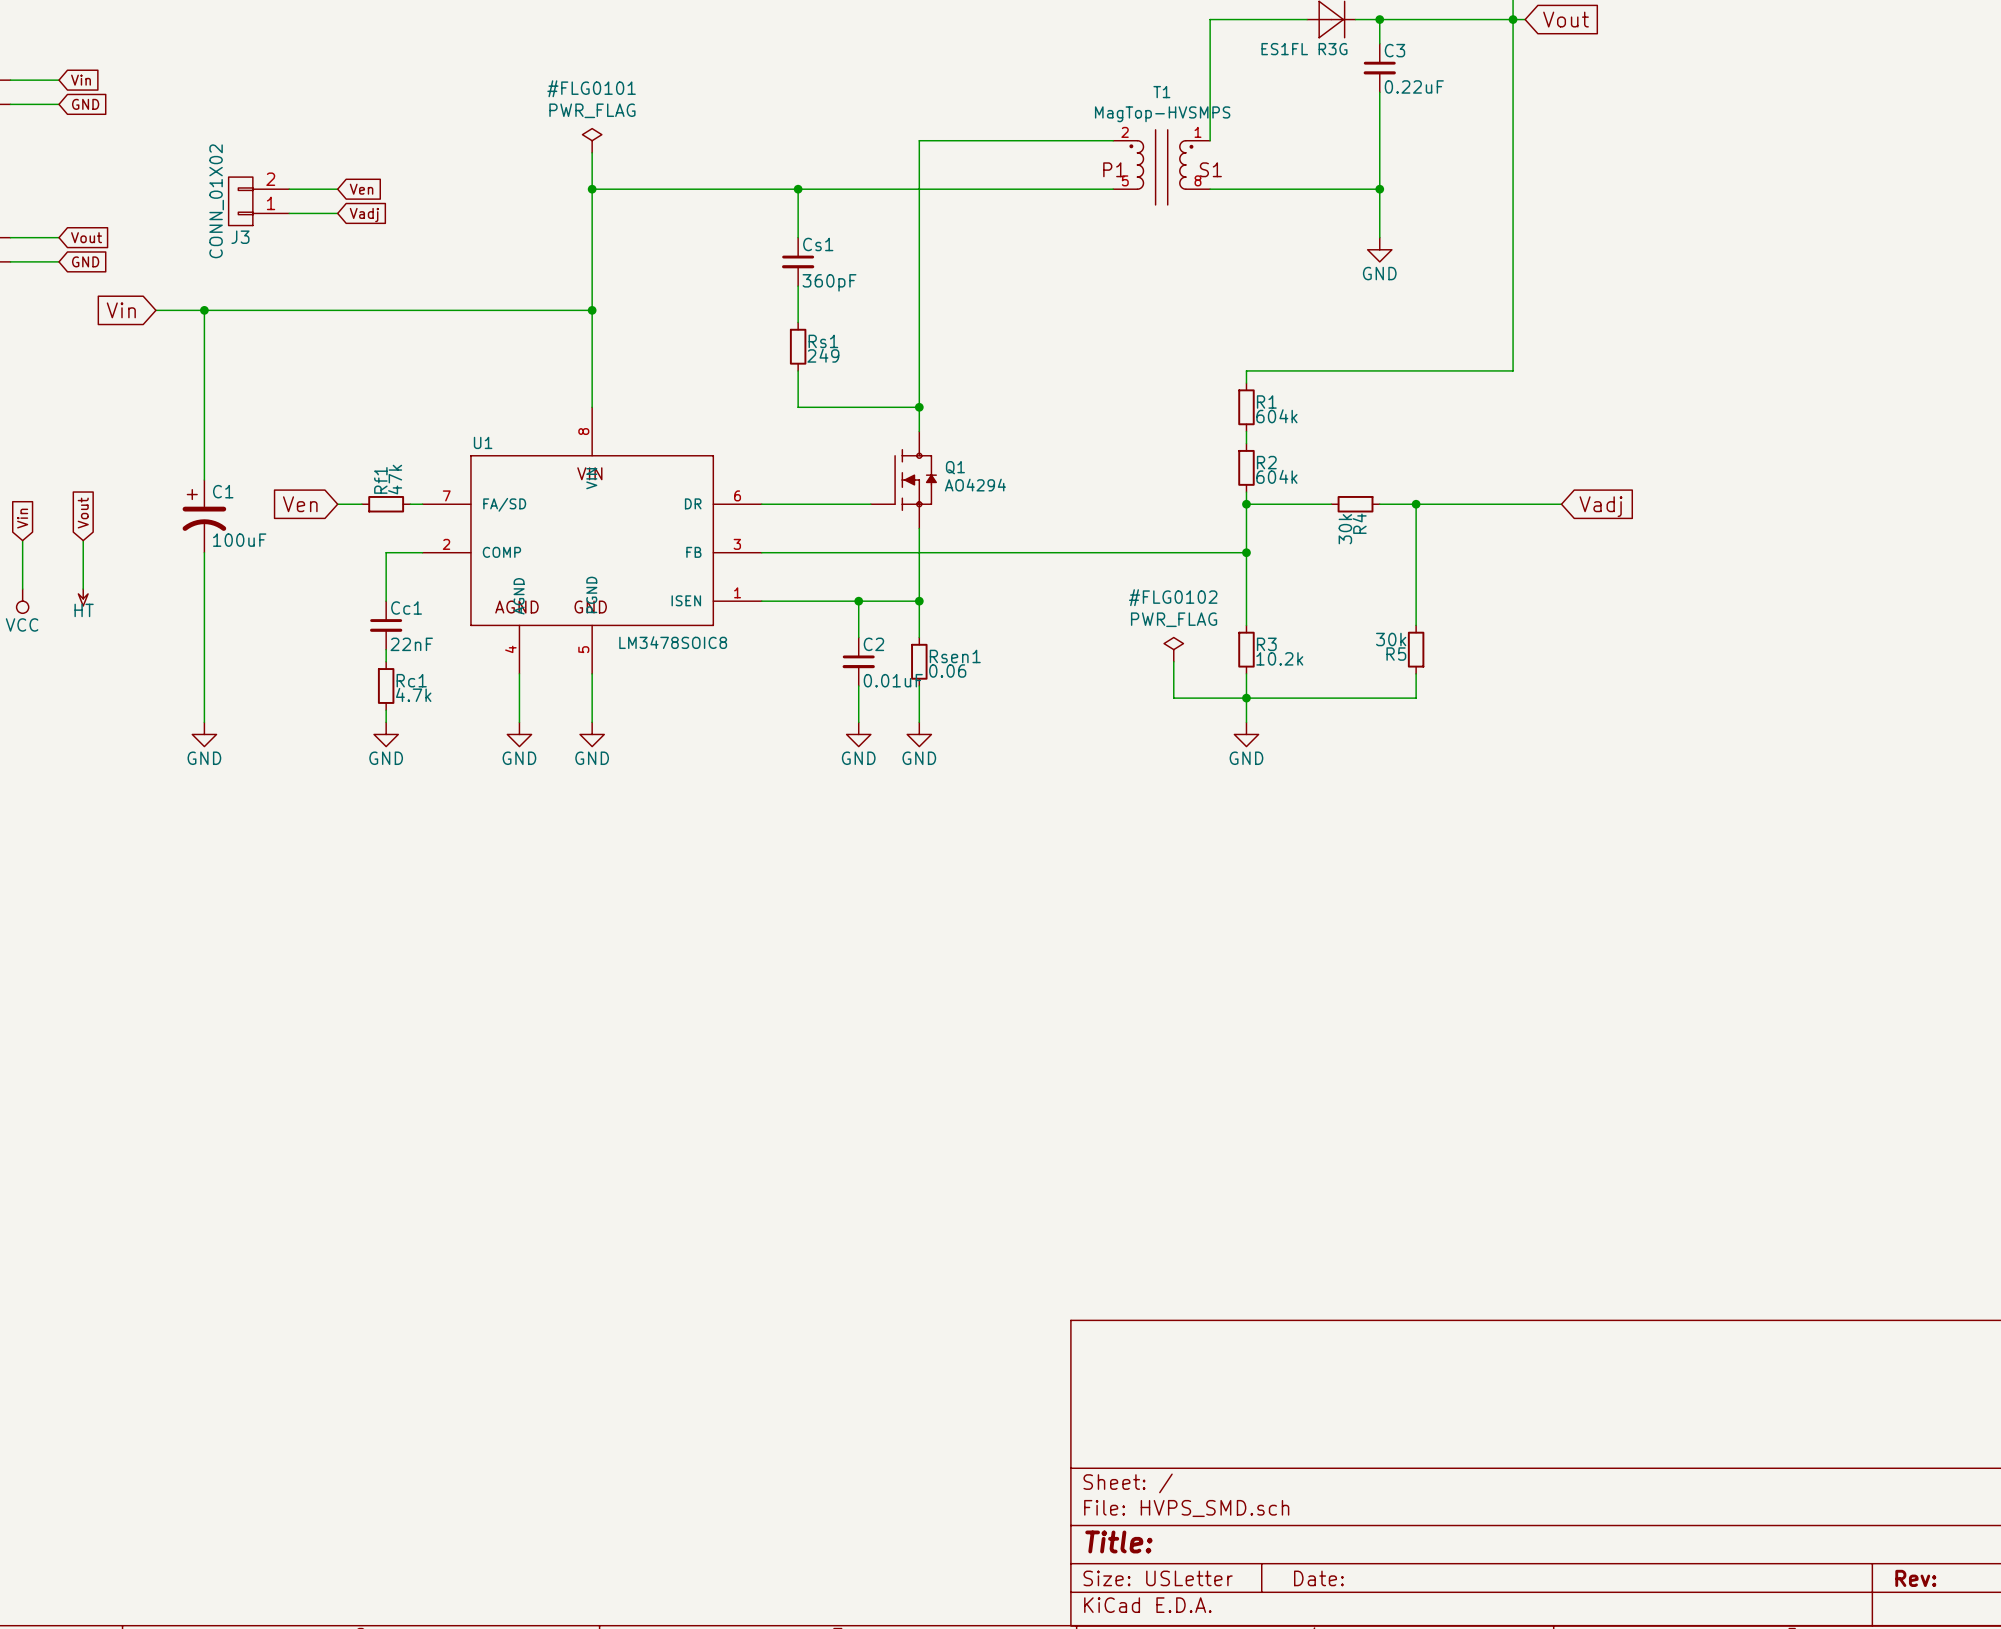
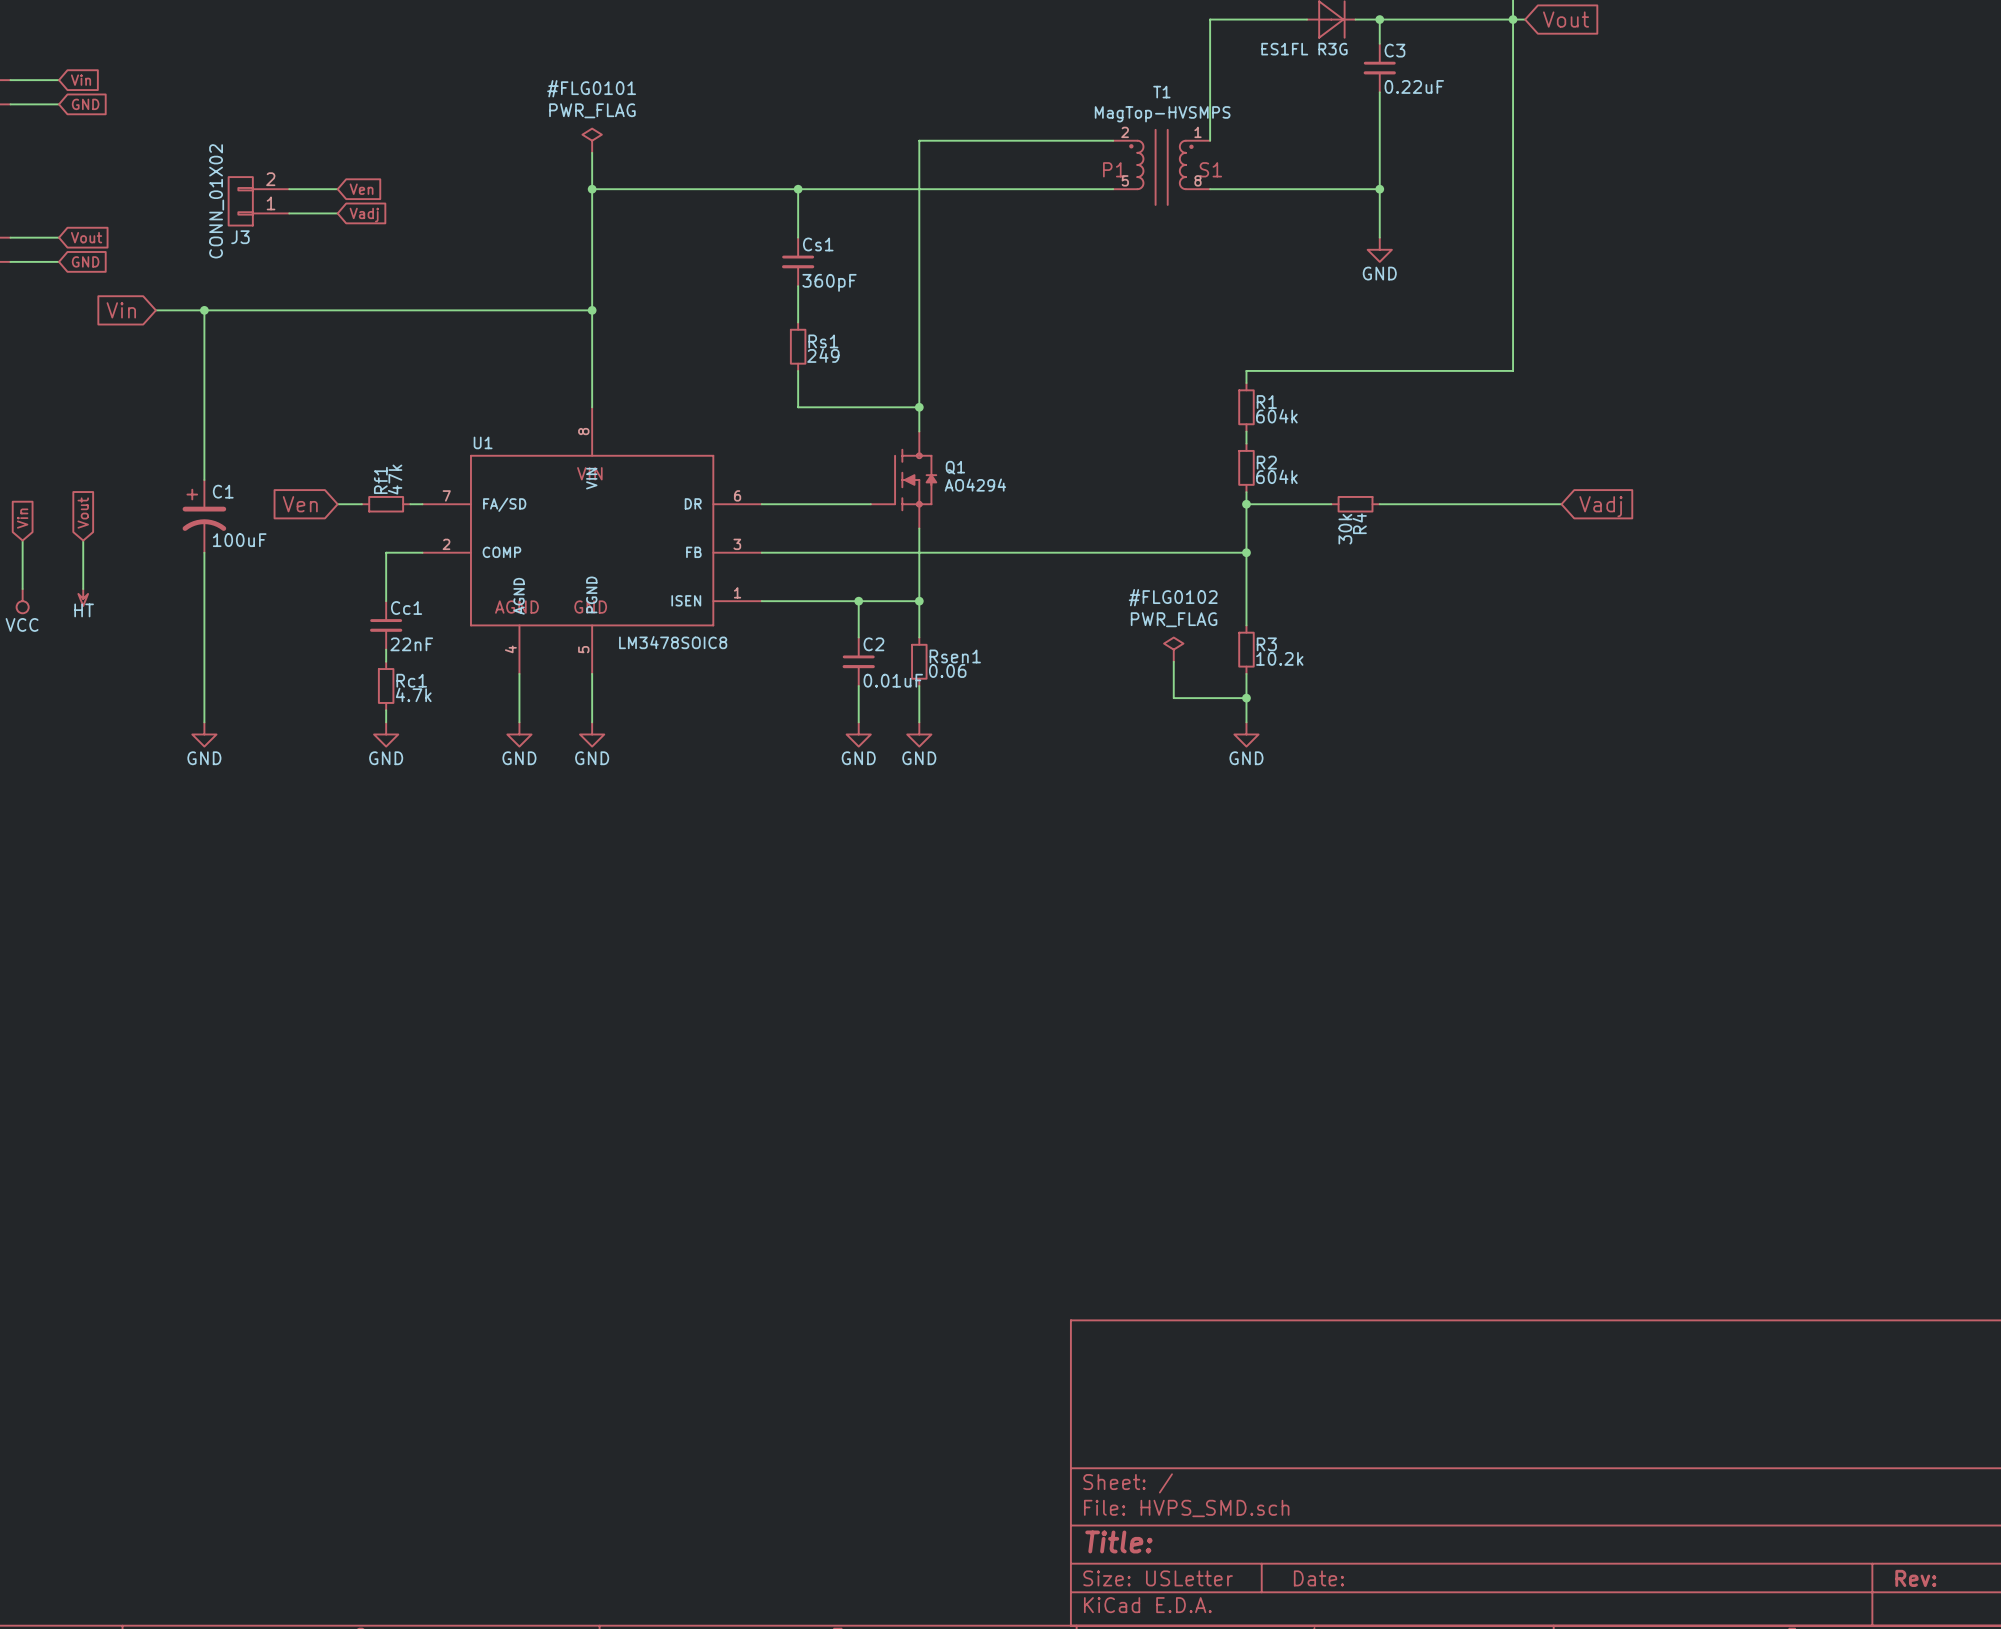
wire: (1416, 504) (1416, 625) -> none
junction: (1416, 504) -> none
R5: 30k (1416, 649) -> none
wire: (1416, 673) (1416, 698) (1246, 698) -> none

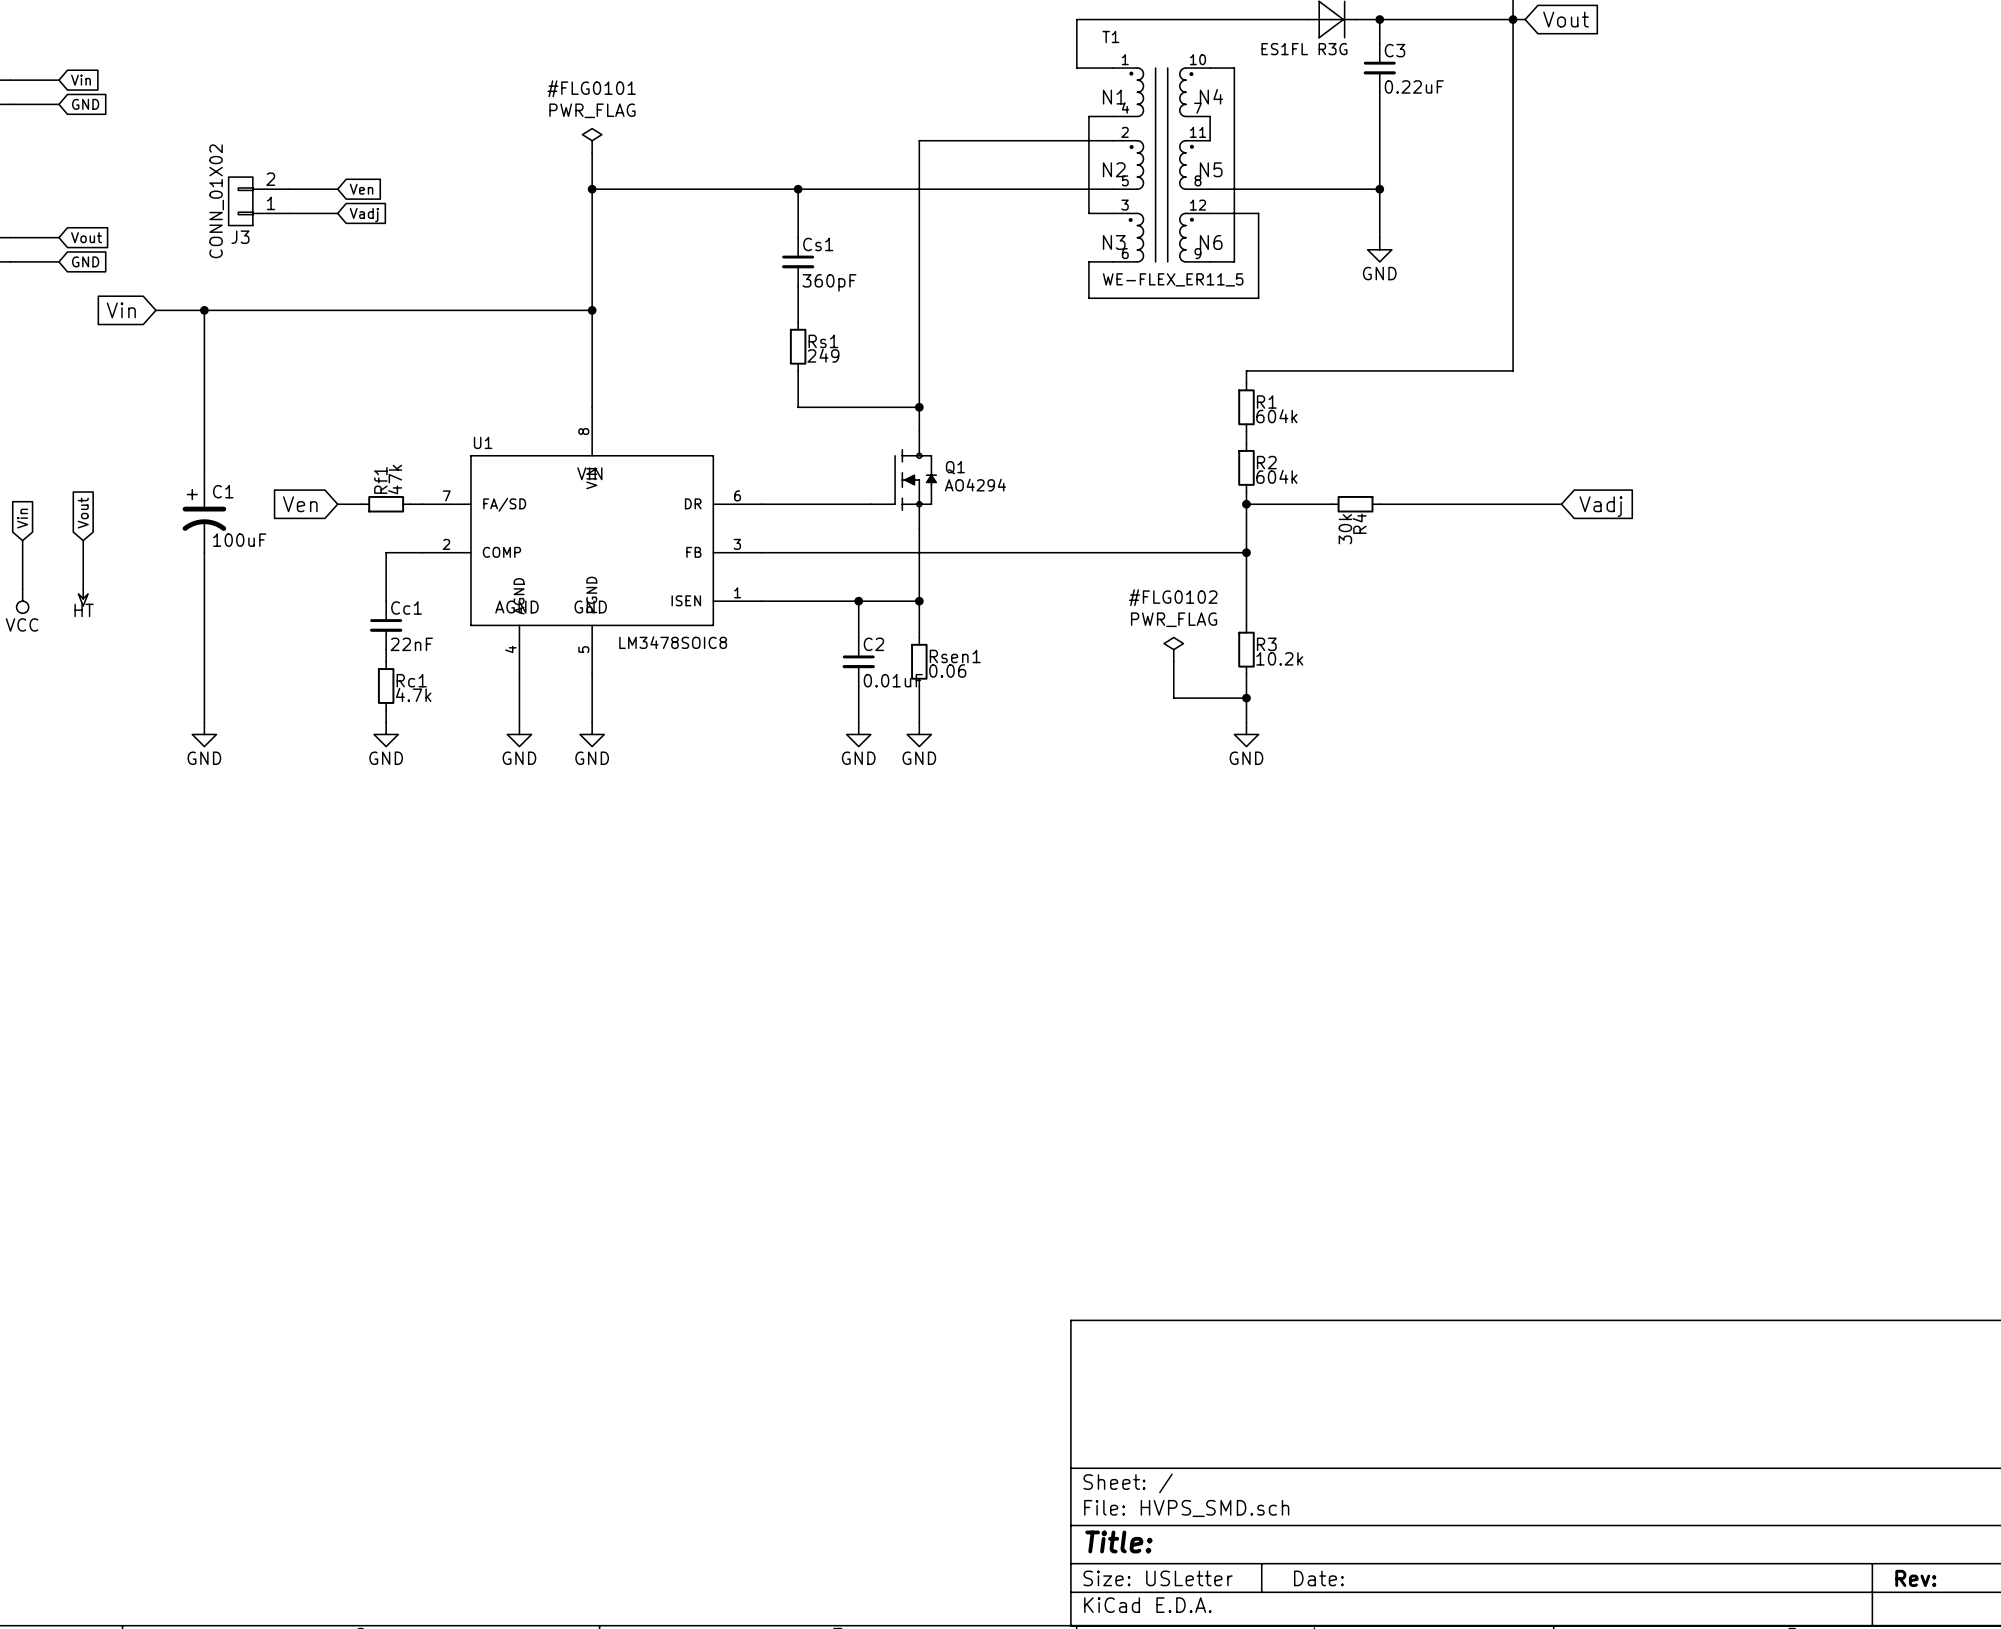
wire: (1210, 19) (1210, 116) -> (1210, 19) (1076, 19) (1076, 68) (1113, 68)
wire: none -> (1210, 68) (1234, 68) (1234, 261) (1210, 261)
T1 name position: T1 (1161, 92) -> T1 (1110, 37)
T1 value: MagTop-HVSMPS (1162, 114) -> WE-FLEX_ER11_5 (1173, 279)
wire: none -> (1113, 116) (1088, 116) (1088, 213) (1113, 213)
T1 symbol: [1113, 129, 1211, 205] -> [1113, 68, 1211, 262]
wire: none -> (1210, 213) (1258, 213) (1258, 298) (1088, 298) (1088, 261) (1113, 261)

